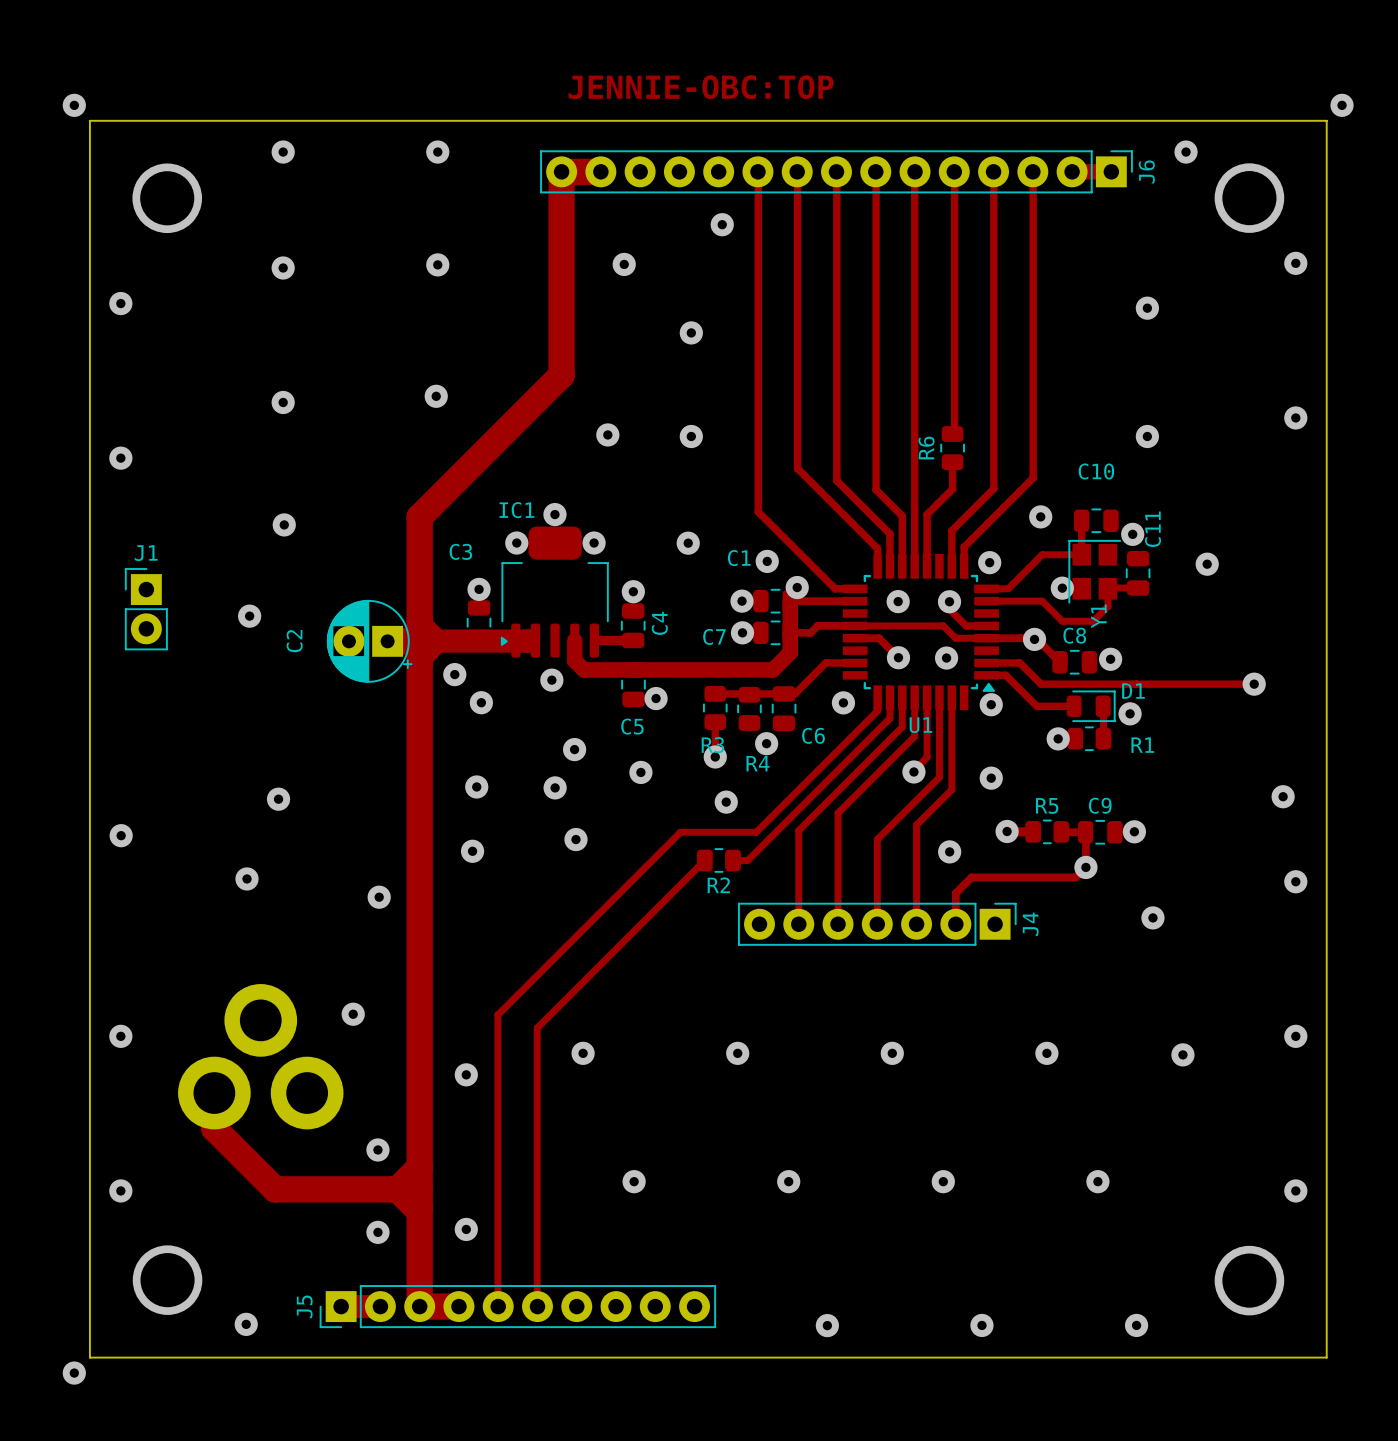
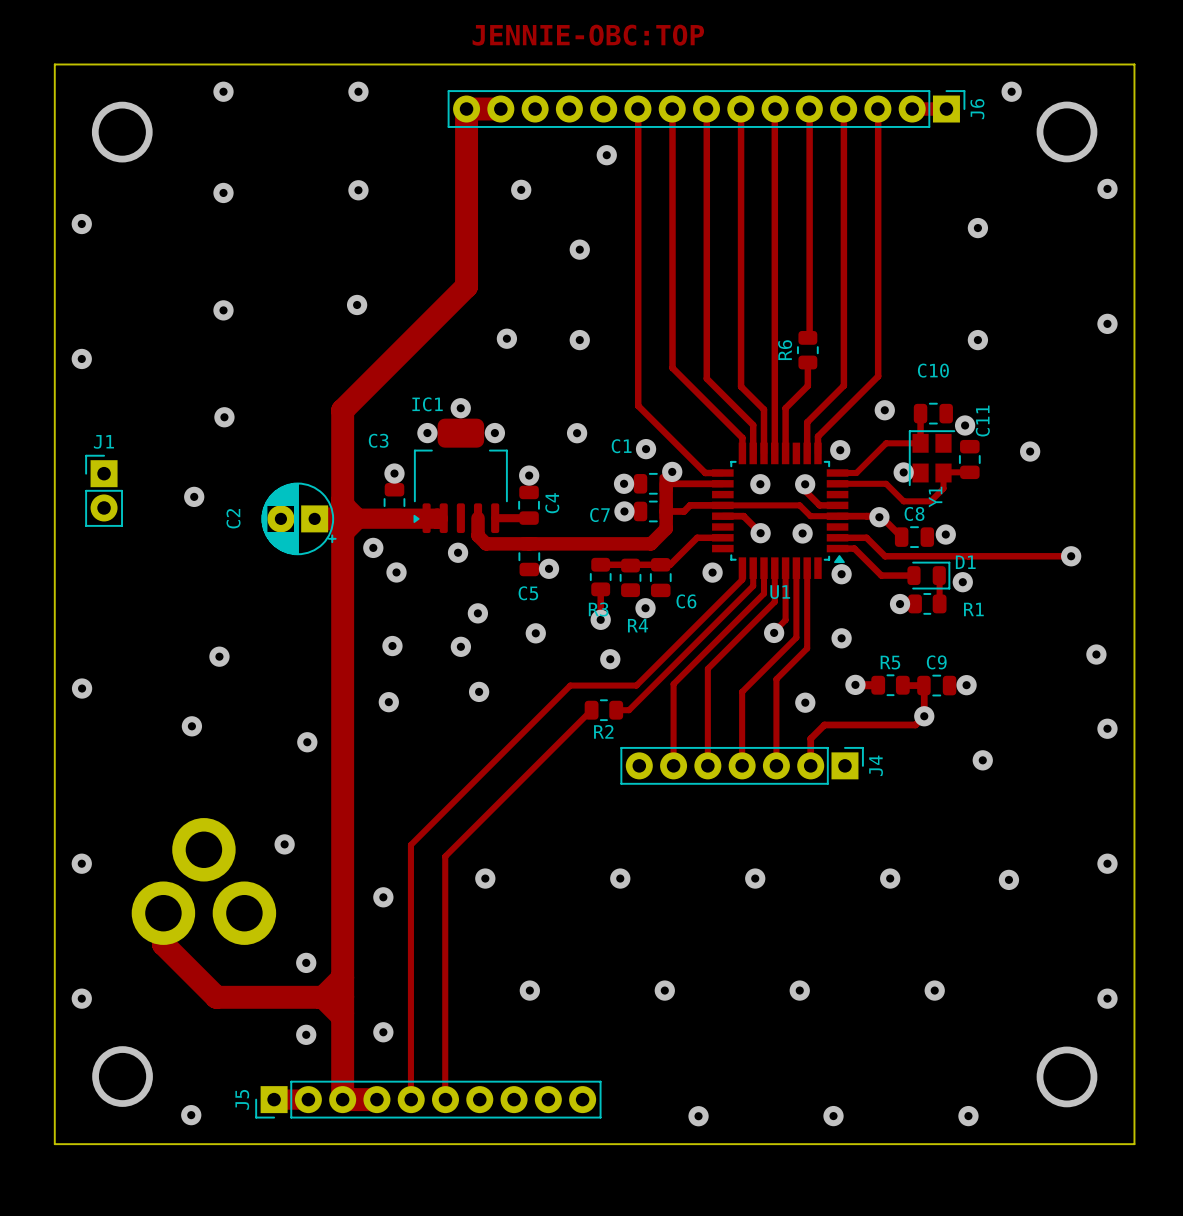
via: (74, 105) -> none
via: (1342, 105) -> none
via: (74, 1373) -> none

